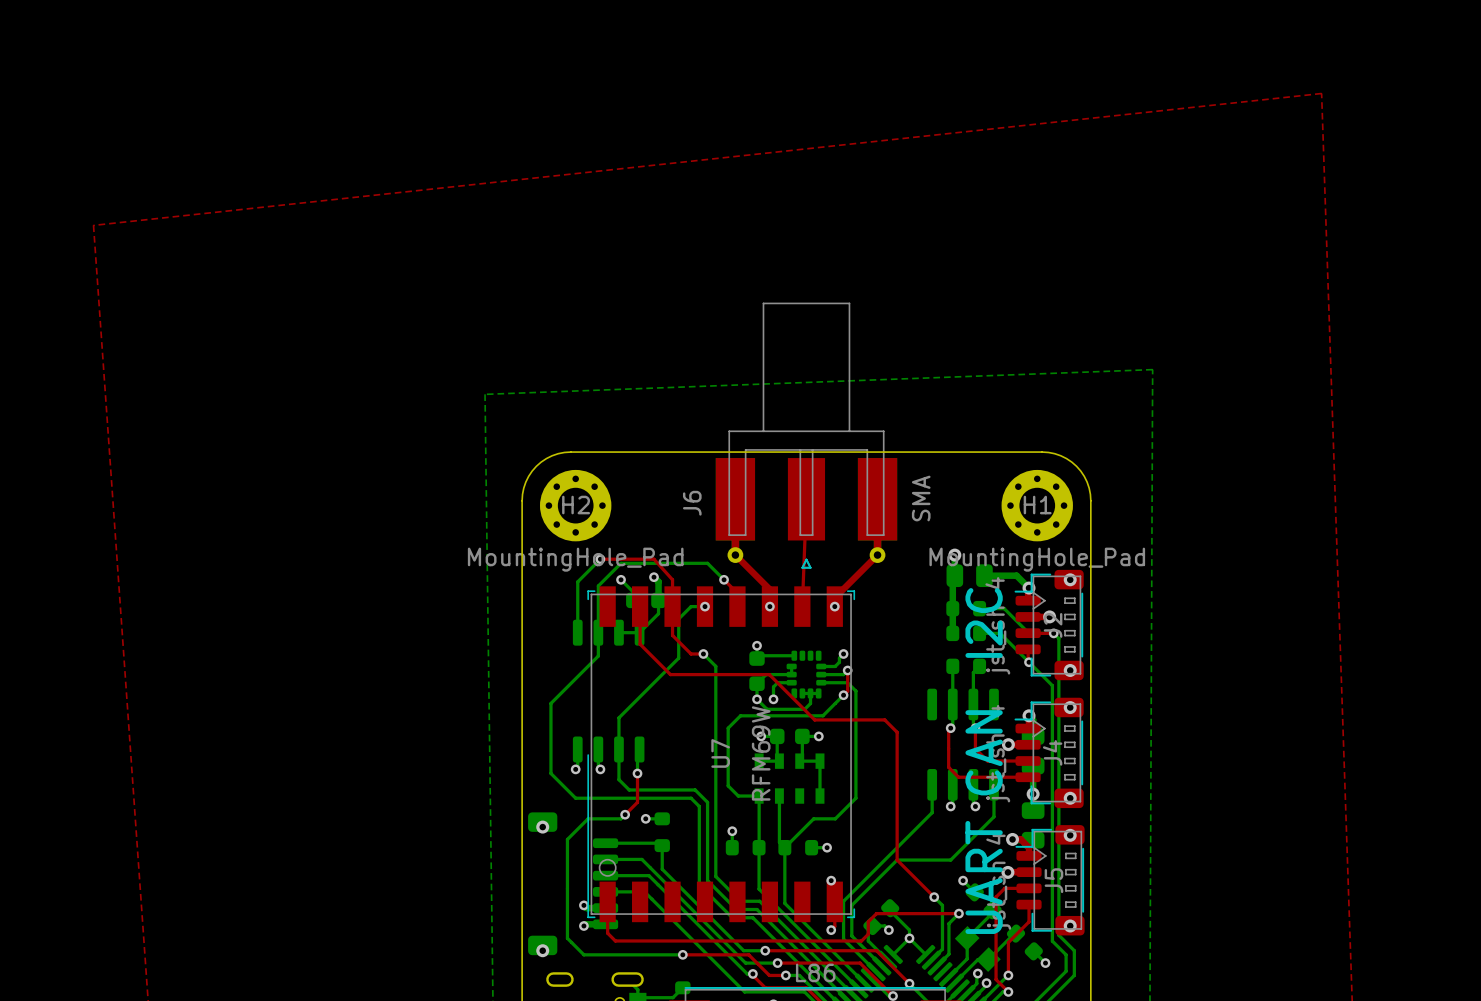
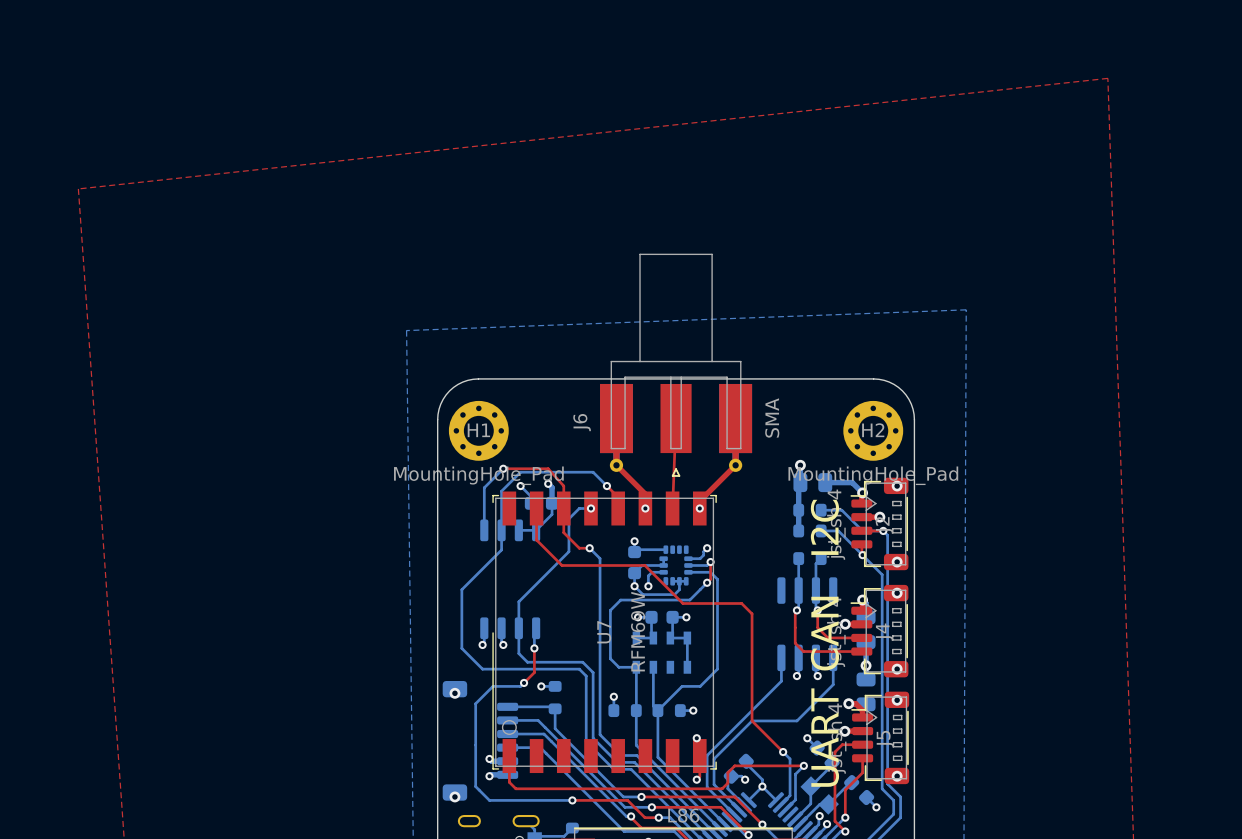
H2 position: (575, 505) -> (873, 430)
H1 position: (1037, 505) -> (478, 430)

